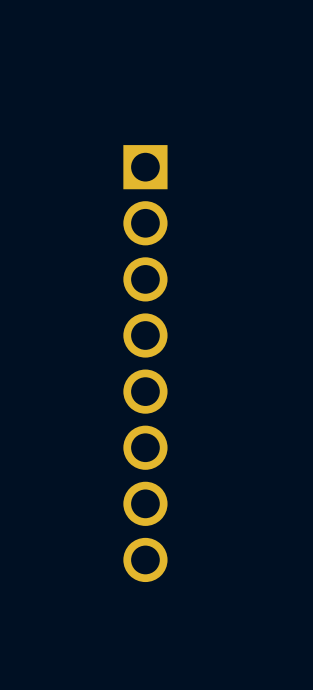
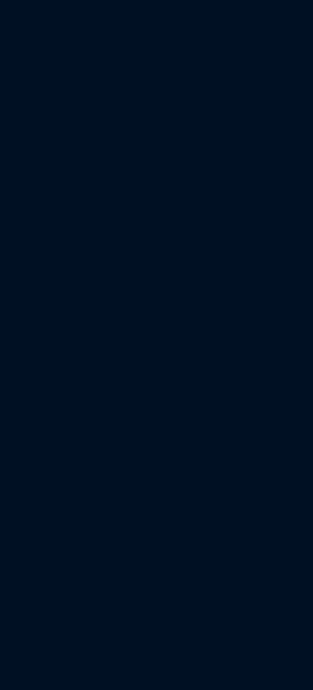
part: (145, 363) -> none

